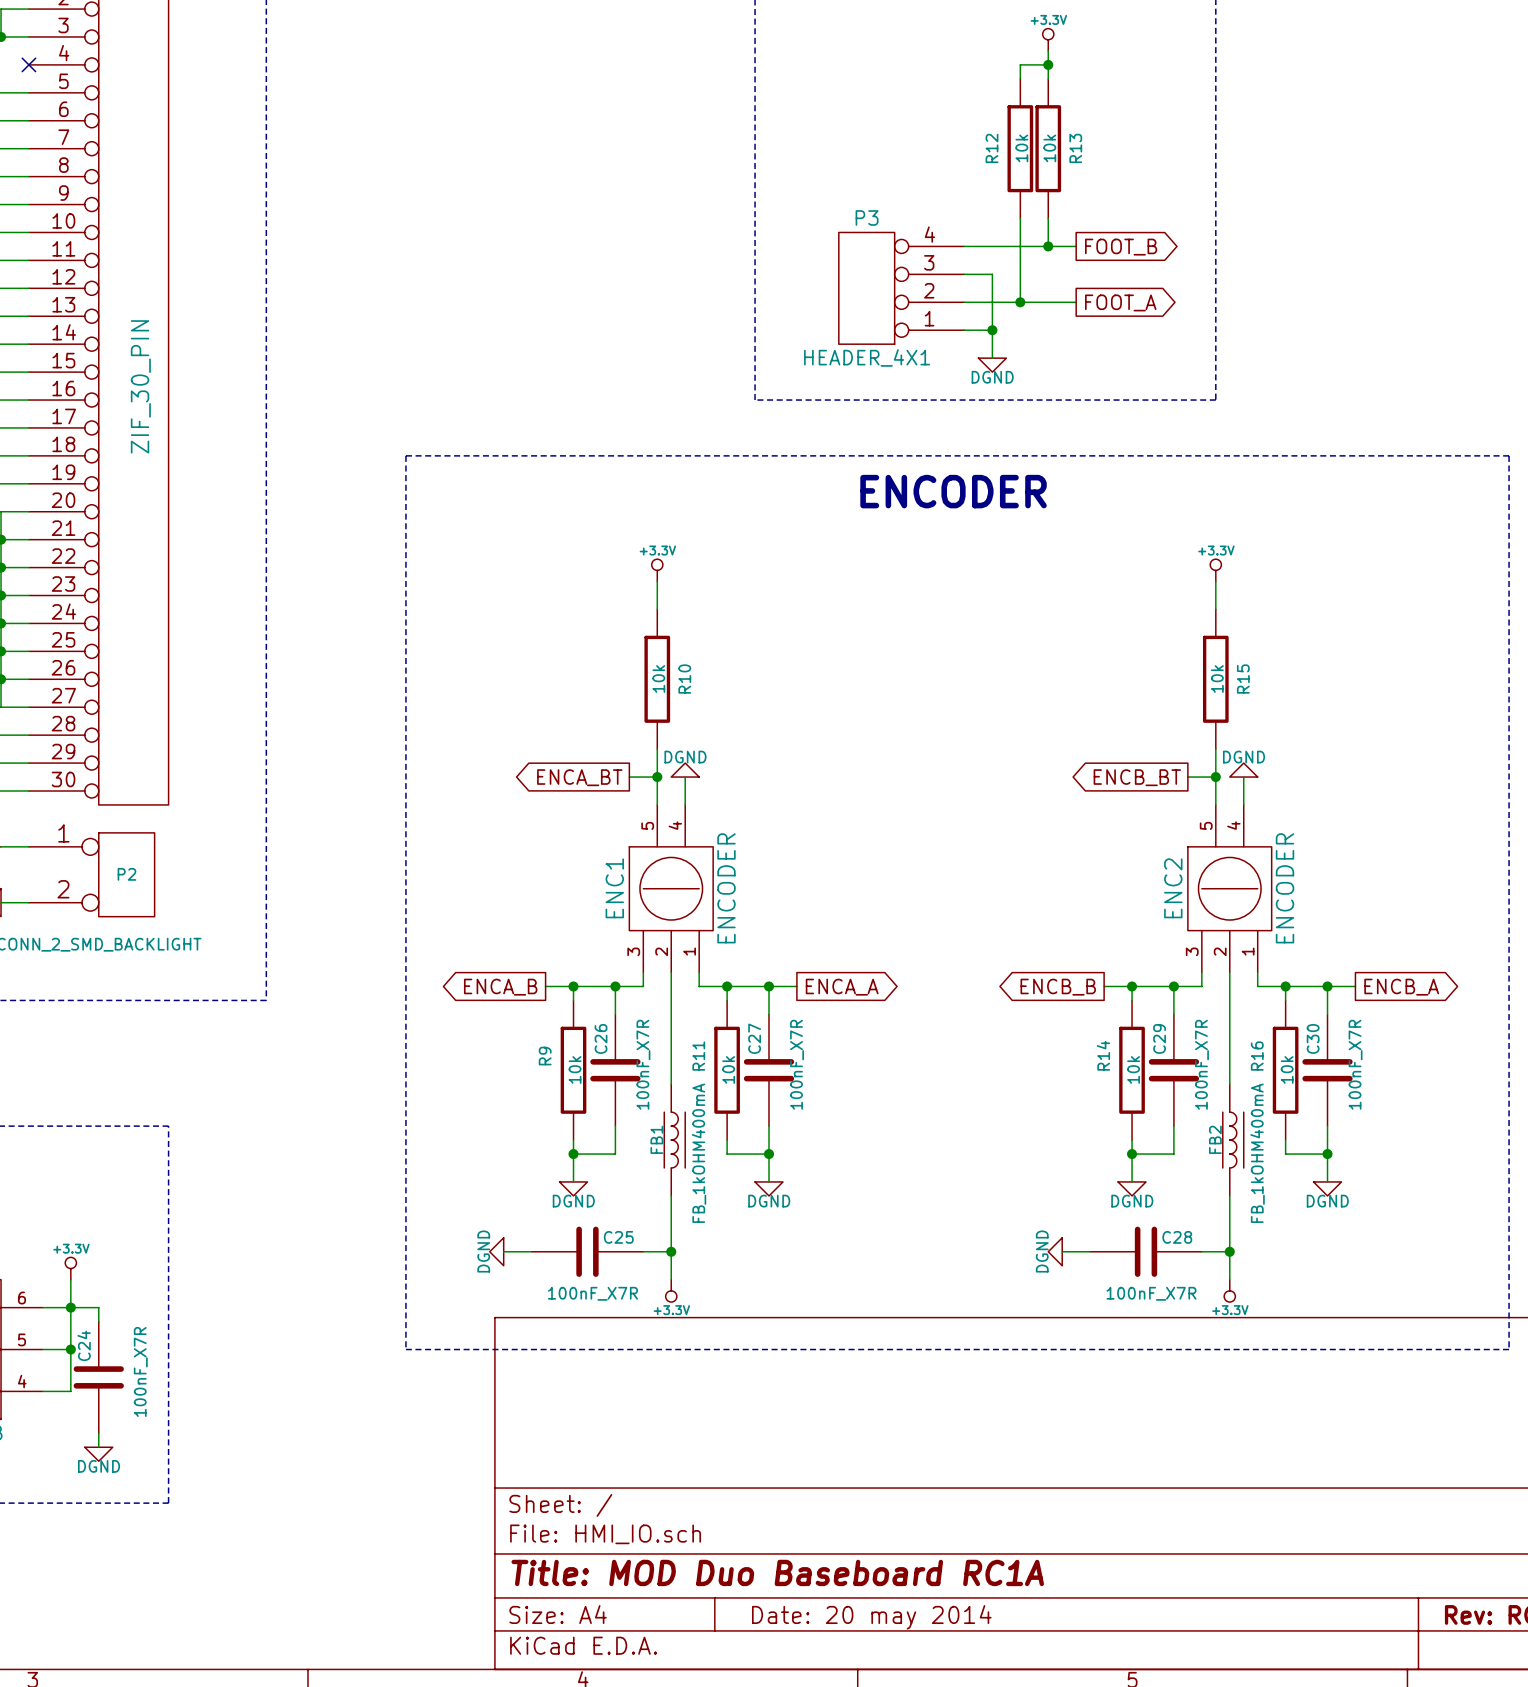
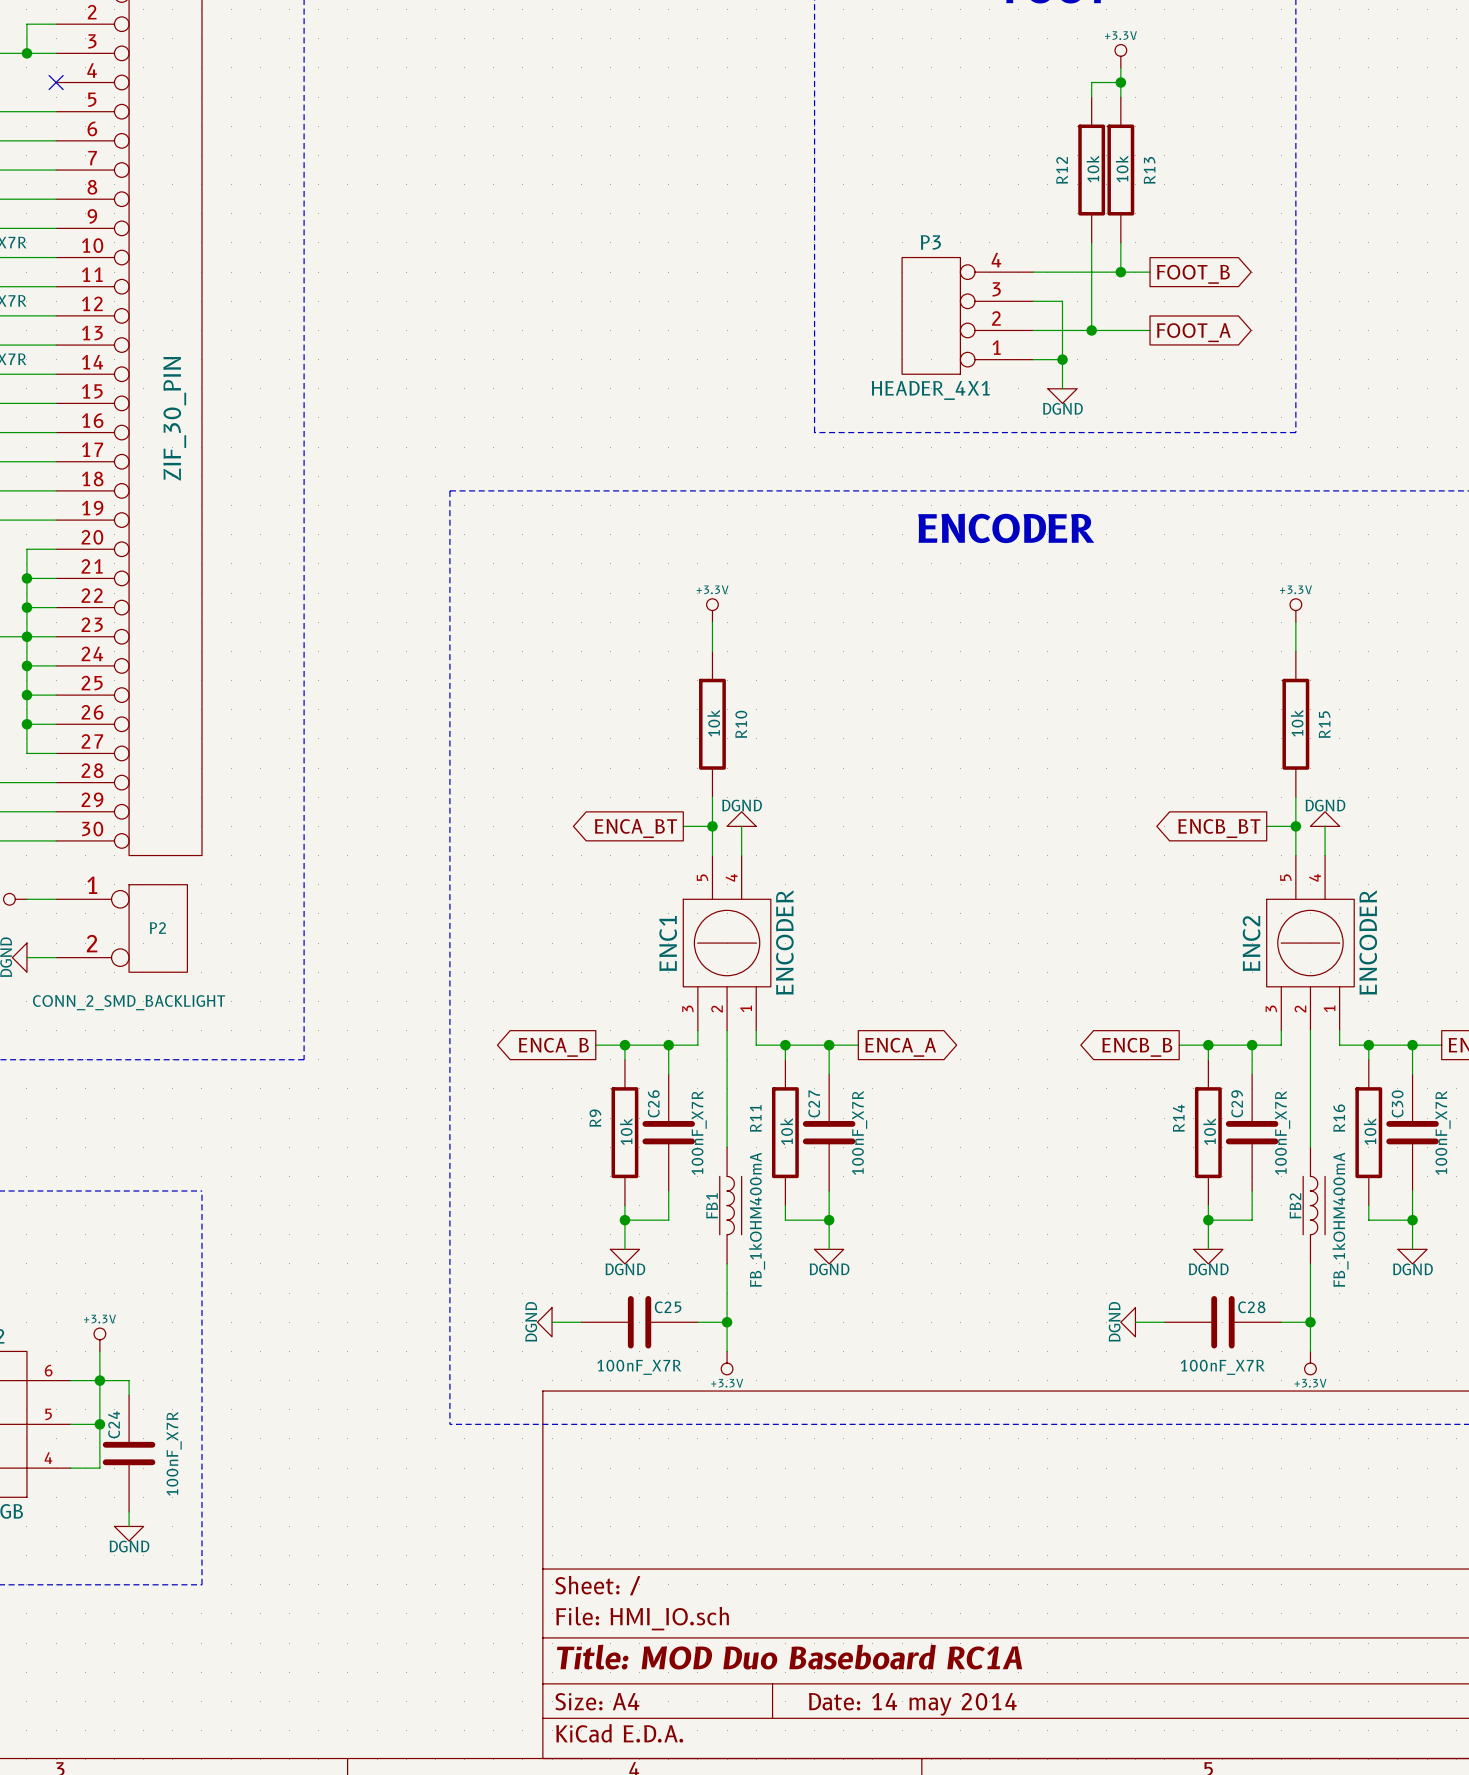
title block: Date: 20 may 2014 (871, 1617) -> Date: 14 may 2014 (912, 1704)

